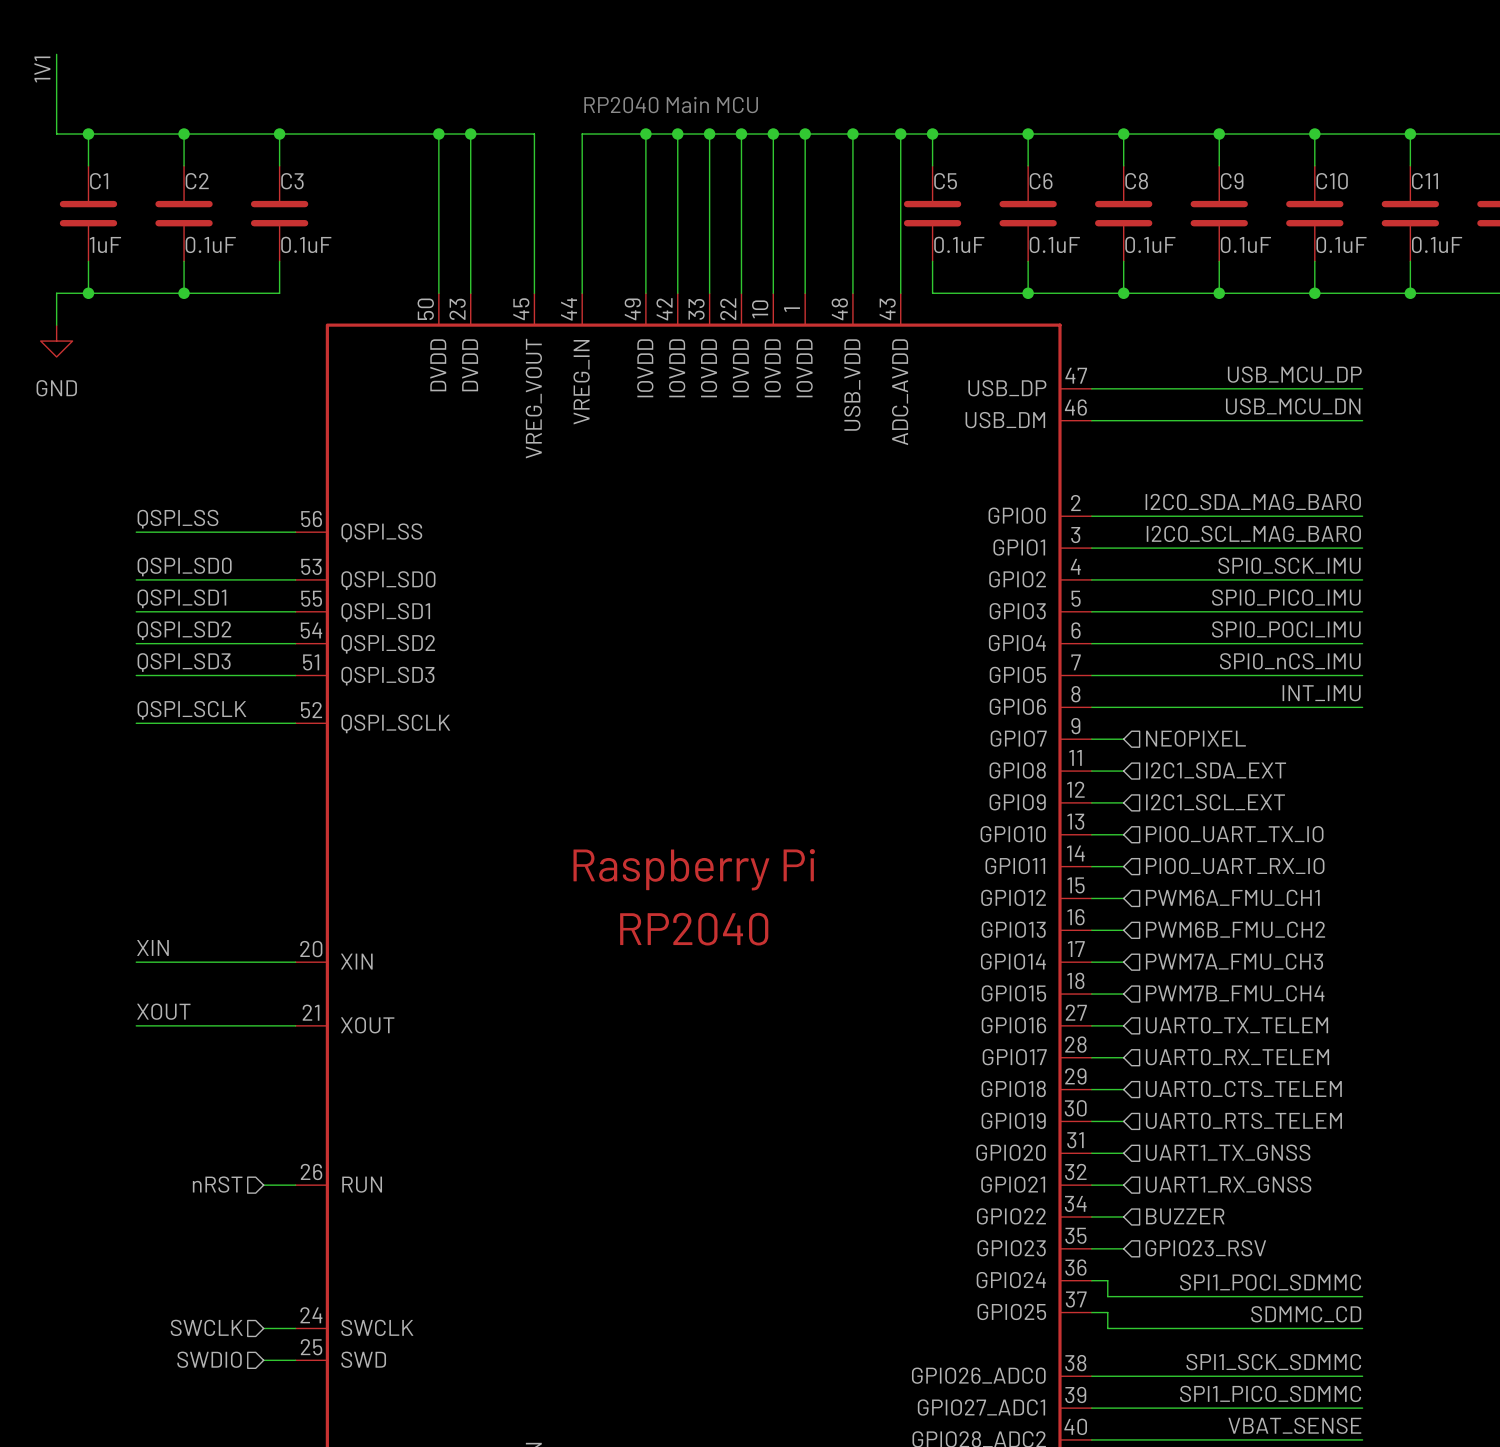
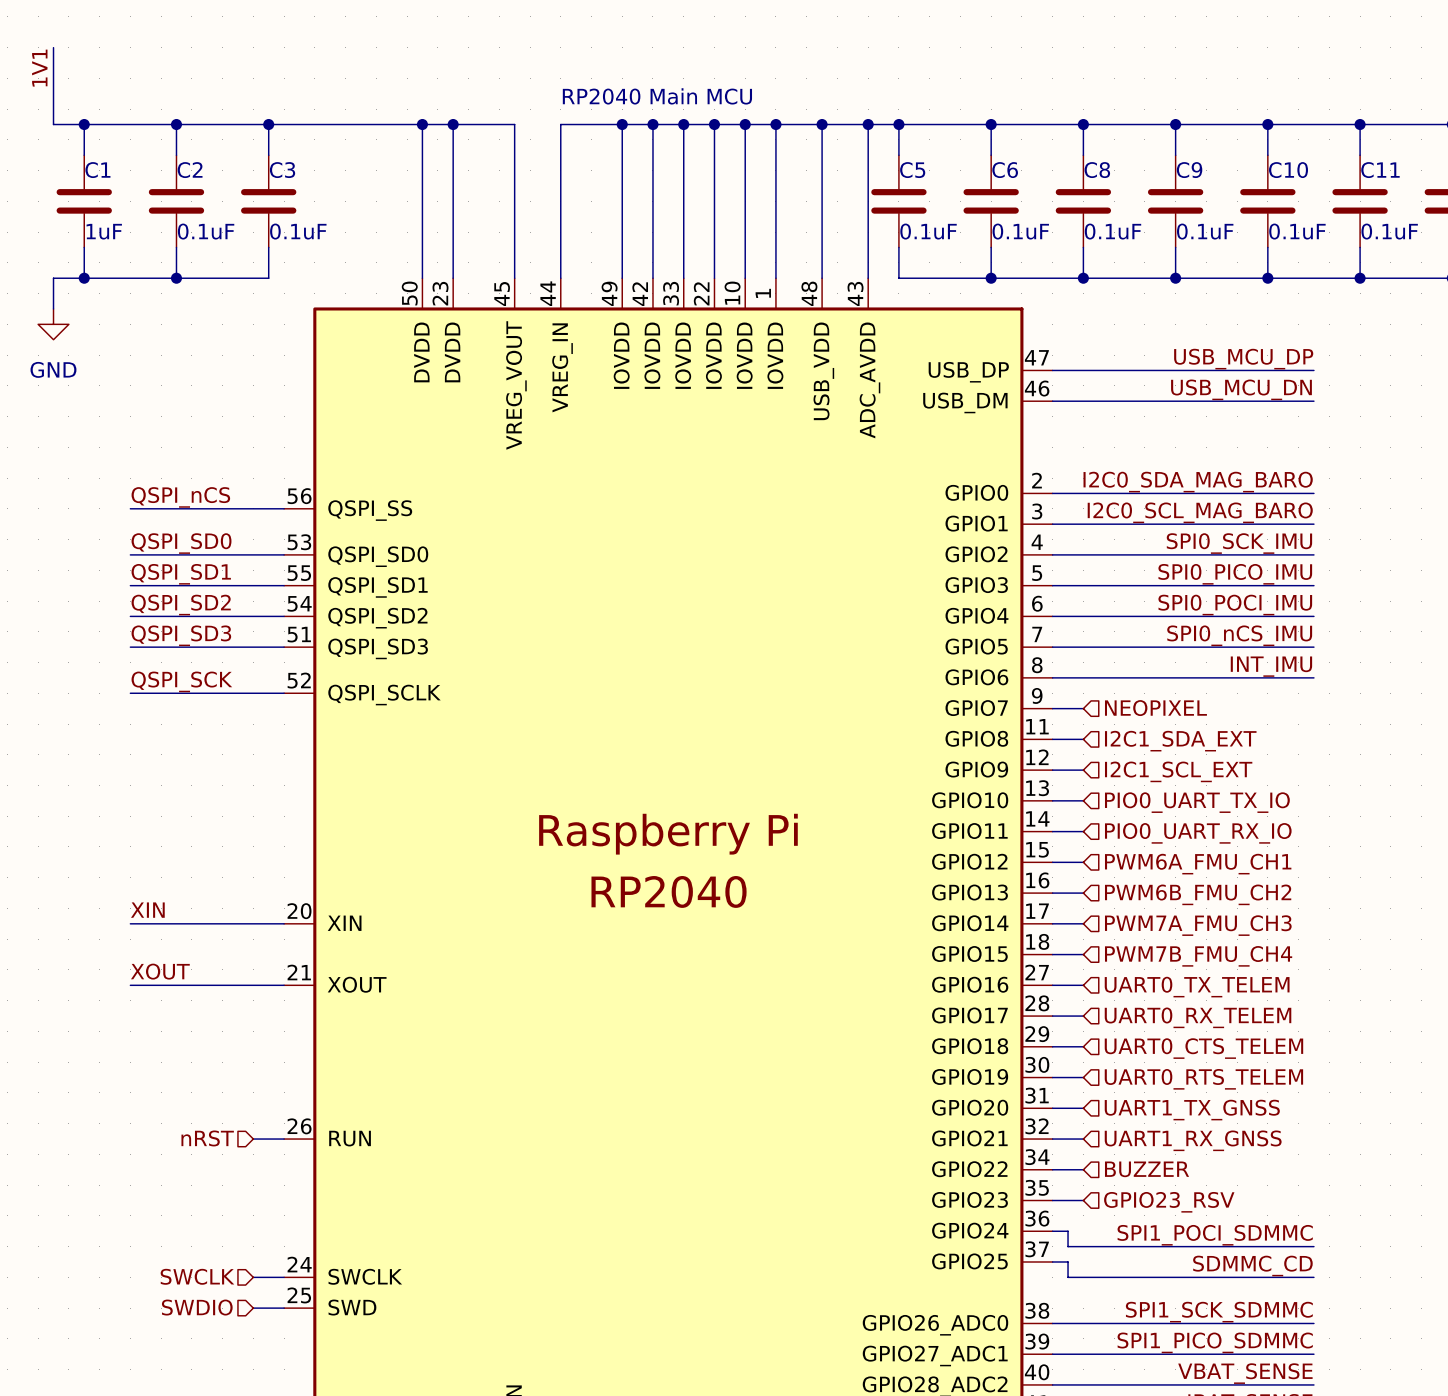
label: QSPI_SS (177, 519) -> QSPI_nCS (180, 497)
label: QSPI_SCLK (191, 710) -> QSPI_SCK (181, 681)

